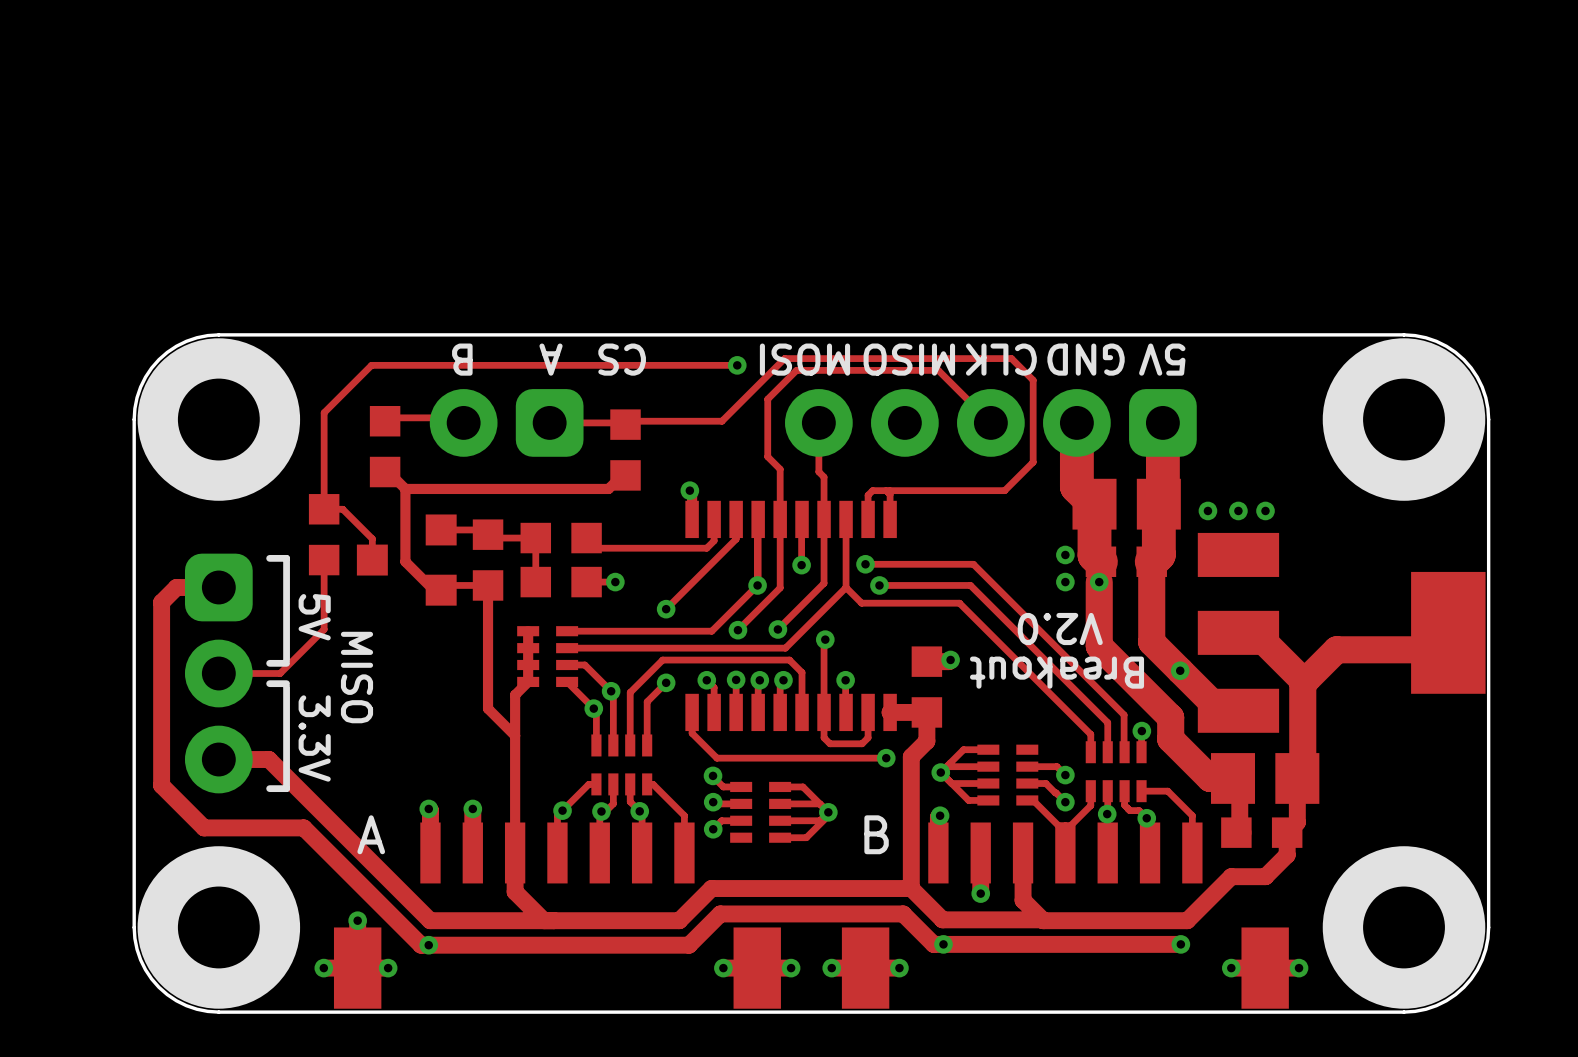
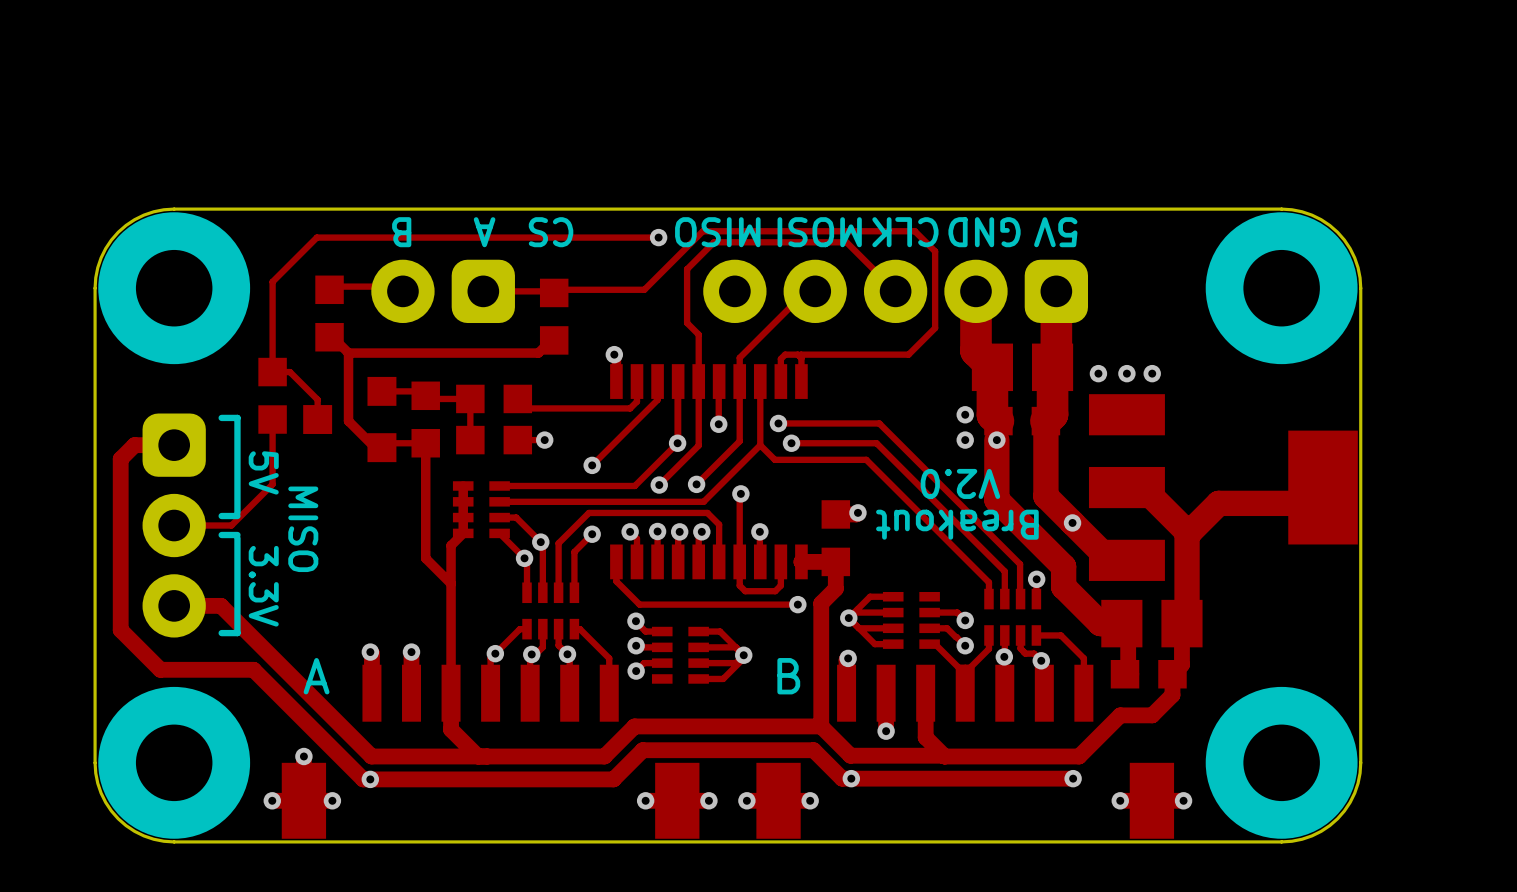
text: MOSI (804, 359) -> MISO (717, 232)
text: MISO (909, 359) -> MOSI (819, 232)
track: (818, 422) (818, 471) (824, 477) (824, 494) -> (815, 291) (806, 291) (739, 357)

